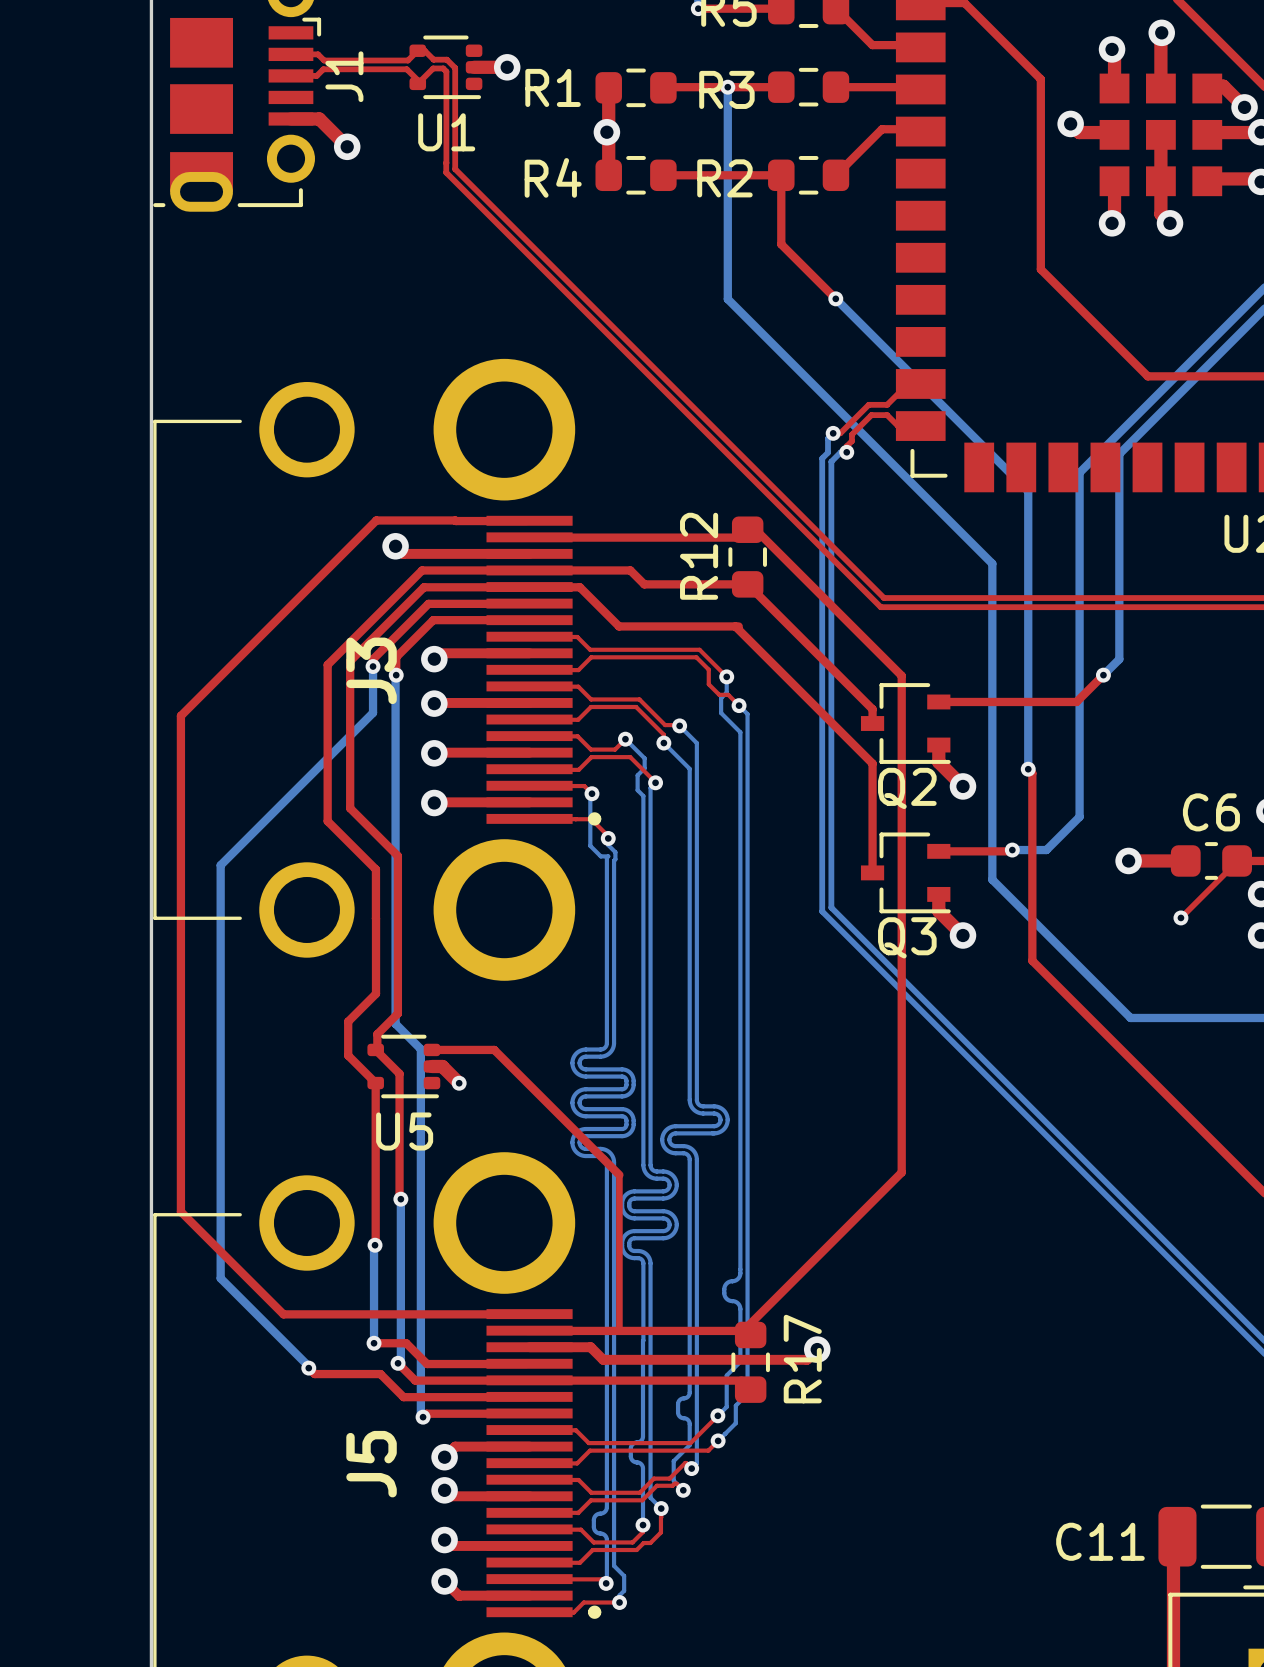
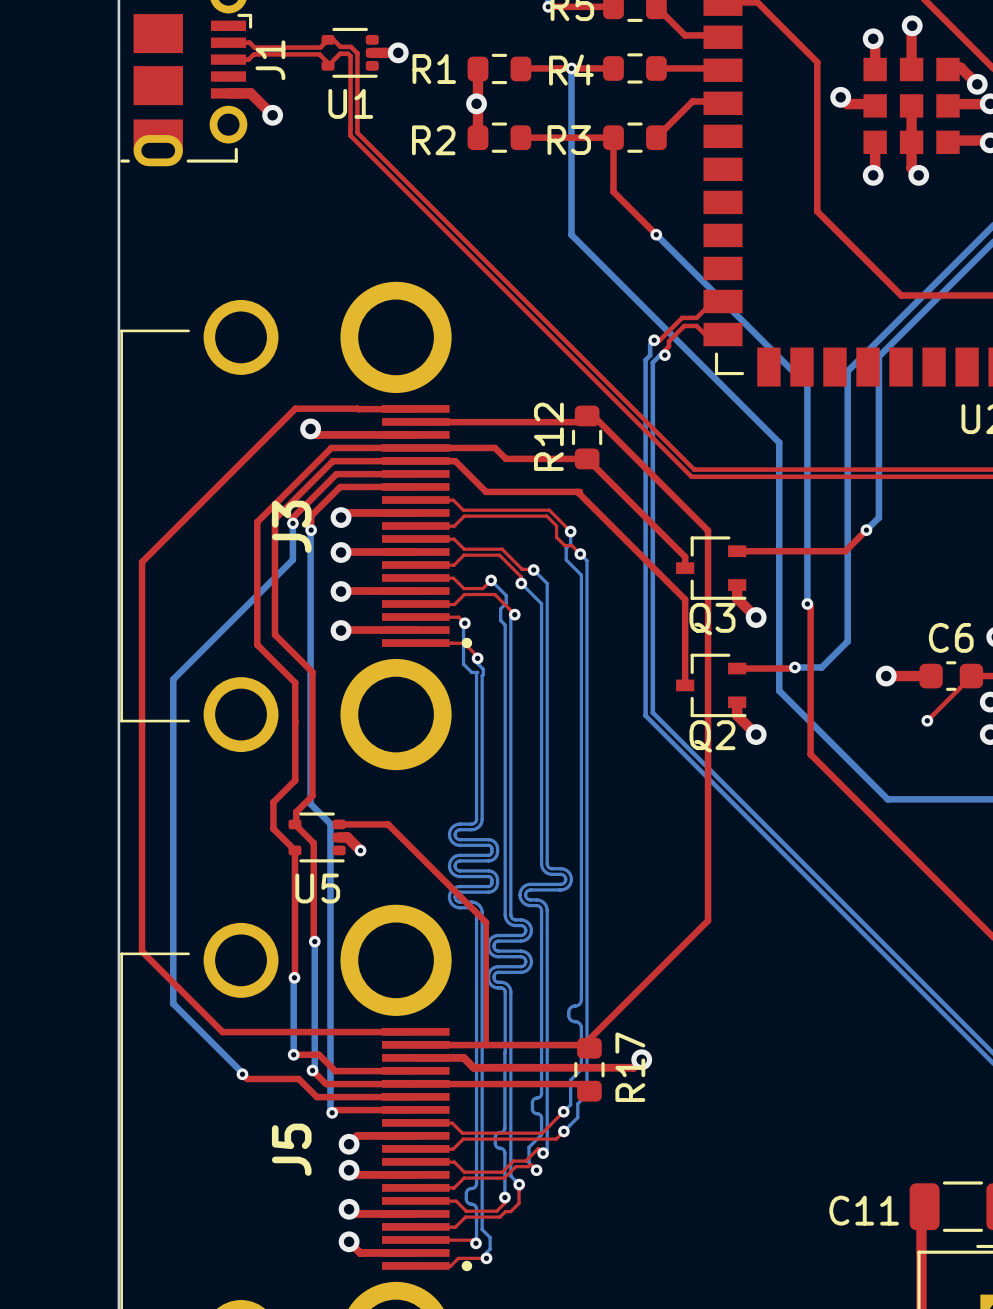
R3 name: R3 (726, 89) -> R4 (571, 69)
R4 name: R4 (553, 177) -> R2 (433, 140)
R2 name: R2 (724, 178) -> R3 (569, 140)
Q2 name: Q2 (907, 788) -> Q3 (712, 619)
Q3 name: Q3 (907, 937) -> Q2 (712, 736)

